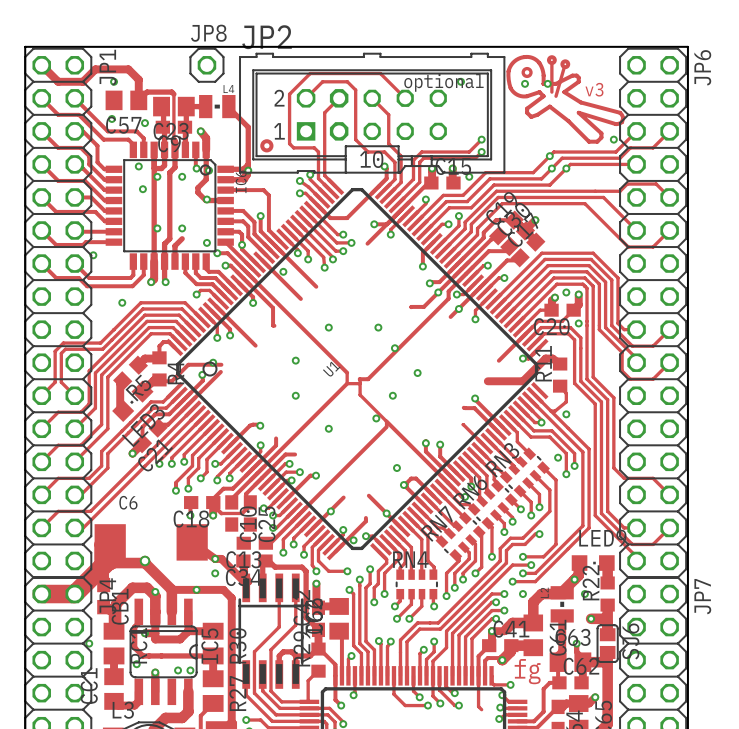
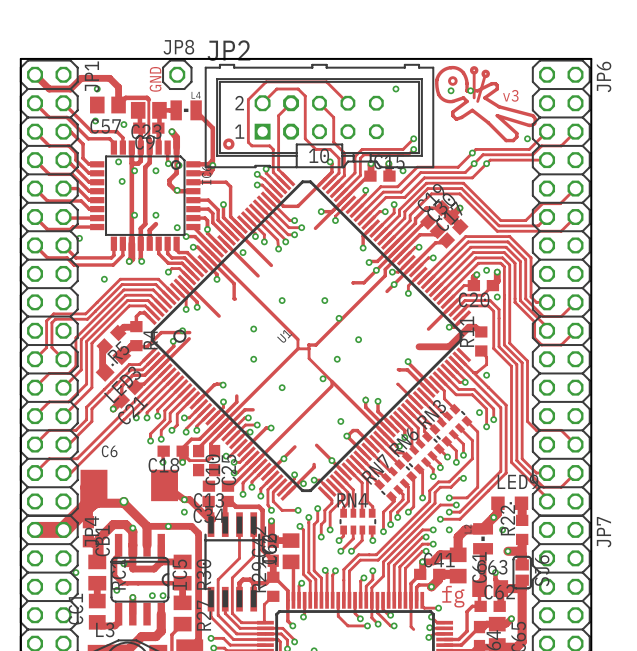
text: none -> GND (155, 79)
text: optional (443, 82) -> none
track: (539, 191) (620, 191) (627, 184) (656, 184) (669, 197) -> (463, 183) (500, 220) (525, 220) (542, 203) (560, 203) (575, 188)
track: (537, 197) (603, 197) (636, 230) -> (461, 188) (499, 225) (538, 225) (547, 217)
track: (535, 203) (584, 203) (628, 247) -> (459, 193) (497, 231) (539, 231)

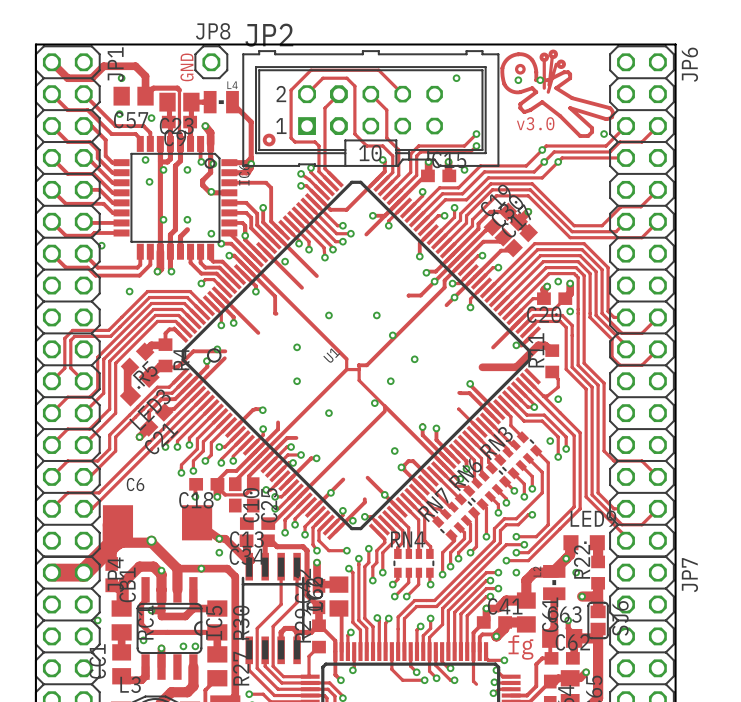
drawing: none -> [548, 49, 566, 70]
drawing: [481, 69, 490, 79] -> none
track: none -> (552, 57) (549, 85) (549, 79)
text: v3 (510, 95) -> none
text: none -> v3.0 (535, 123)

